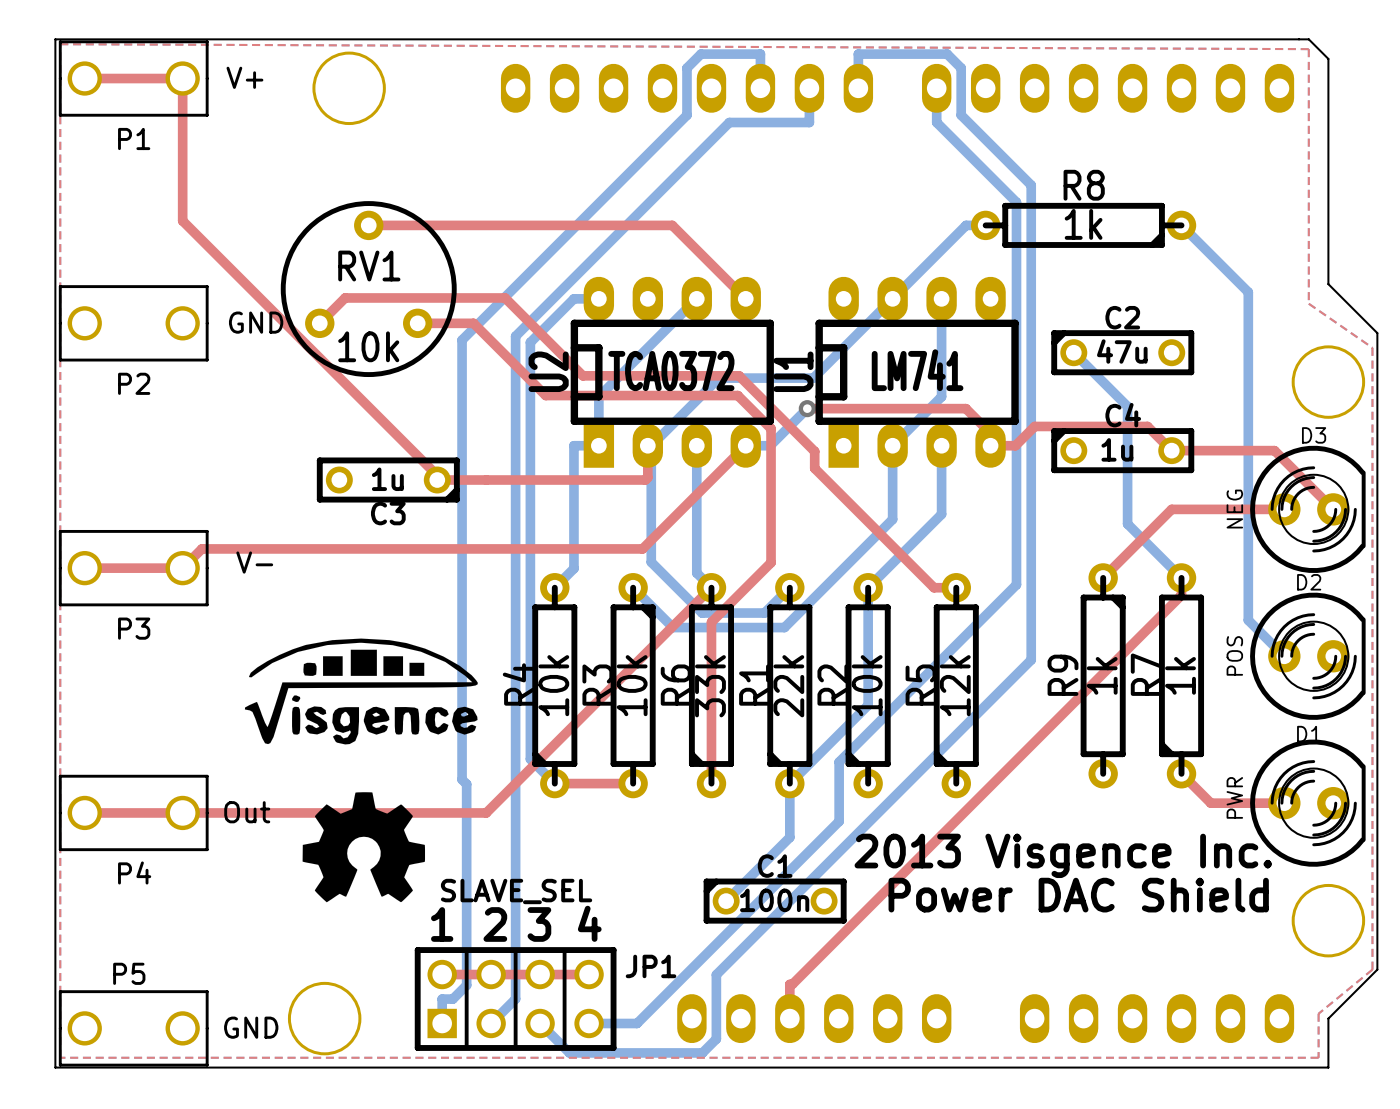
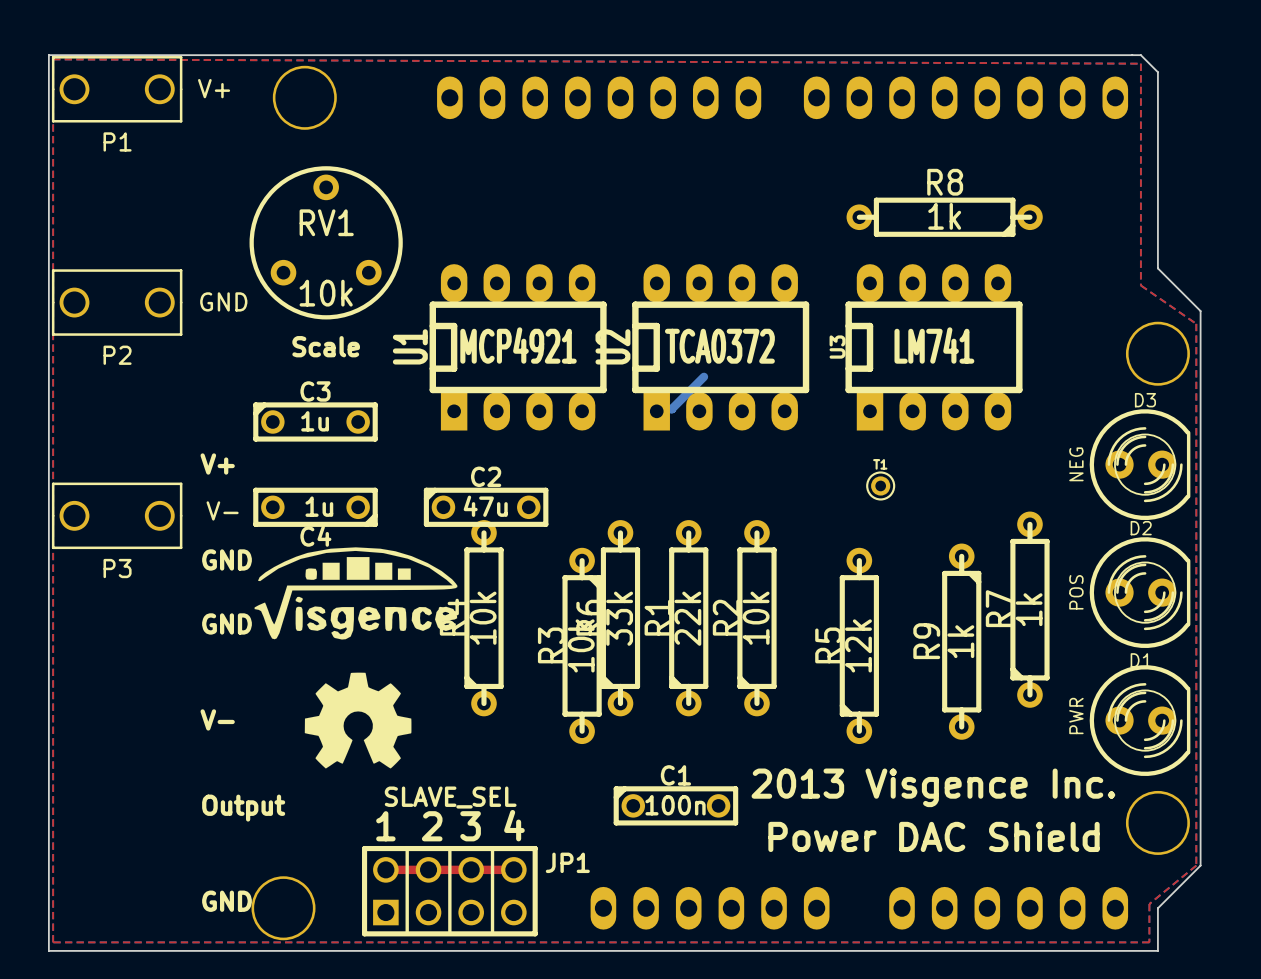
top track: (84, 78) (182, 78) (182, 220) (441, 480) (645, 480) (647, 477) (647, 445) -> none
bottom track: (760, 88) (760, 54) (700, 54) (686, 68) (686, 115) (462, 340) (462, 779) (466, 784) (466, 985) (452, 999) (442, 999) (442, 1023) -> none
bottom track: (809, 88) (809, 122) (729, 122) (515, 336) (515, 999) (491, 1023) -> none
bottom track: (858, 88) (858, 54) (947, 54) (961, 68) (961, 115) (1031, 185) (1031, 659) (716, 974) (716, 1039) (702, 1052) (569, 1052) (540, 1023) -> none
bottom track: (936, 88) (936, 122) (1016, 202) (1016, 584) (839, 762) (839, 821) (637, 1023) (589, 1023) -> none
top track: (368, 225) (672, 225) (745, 298) -> none
bottom track: (985, 225) (966, 225) (813, 378) (718, 378) (651, 445) -> none
bottom track: (1181, 225) (1248, 292) (1248, 620) (1284, 656) -> none
RV1 position: (368, 289) -> (326, 242)
bottom track: (598, 298) (573, 298) (530, 342) (530, 759) (554, 783) -> none
bottom track: (696, 298) (598, 396) (598, 445) (573, 445) (573, 568) (554, 587) -> none
bottom track: (941, 298) (941, 396) (892, 445) (892, 519) (784, 627) (672, 627) (633, 587) -> none
top track: (319, 323) (345, 297) (505, 297) (582, 375) (739, 375) (814, 451) (814, 468) (934, 587) (956, 587) -> none
top track: (417, 323) (473, 323) (545, 395) (737, 395) (771, 428) (771, 562) (711, 622) (711, 783) -> none
bottom track: (1073, 352) (1127, 406) (1127, 524) (1181, 577) -> none
C2 position: (1122, 352) -> (486, 507)
U1 value: LM741 (917, 370) -> MCP4921 (518, 345)
U2 position: (672, 372) -> (720, 347)
U1 position: (917, 372) -> (518, 347)
text: none -> Scale (326, 346)
U3: none -> LM741 (934, 347)
top track: (807, 408) (965, 408) (1003, 445) -> none
via: (807, 408) -> none
bottom track: (651, 445) (651, 562) (702, 613) (764, 613) (789, 587) -> none
bottom track: (696, 445) (696, 573) (711, 587) -> none
top track: (745, 445) (642, 548) (201, 548) (182, 568) (84, 568) -> none
bottom track: (941, 445) (941, 514) (868, 587) (868, 705) (789, 783) (789, 837) (726, 901) -> none
top track: (990, 445) (1015, 445) (1034, 426) (1147, 426) (1171, 450) (1274, 450) (1333, 509) -> none
C4 rotation: 0° (1122, 450) -> 180° (315, 507)
C4 position: (1122, 450) -> (315, 507)
C3 rotation: 0° (388, 480) -> 180° (315, 421)
text: none -> V+ (217, 464)
top track: (1284, 509) (1171, 509) (1103, 577) -> none
T1: none -> (880, 485)
top track: (1181, 577) (1181, 595) (792, 984) (789, 984) (789, 1018) -> none
top track: (711, 587) (486, 812) (84, 812) -> none
text: none -> GND (227, 559)
R9 position: (1103, 675) -> (961, 641)
R3 position: (633, 685) -> (582, 645)
R5 position: (956, 685) -> (859, 645)
drawing position: (361, 691) -> (355, 593)
text: none -> GND (227, 623)
top track: (1181, 773) (1210, 803) (1284, 803) -> none
top track: (554, 783) (633, 783) -> none
text: none -> V- (217, 719)
P4: Out (133, 812) -> none
drawing position: (363, 847) -> (358, 720)
text position: 2013 Visgence Inc. (1063, 855) -> 2013 Visgence Inc. (933, 787)
text position: Power DAC Shield (1078, 895) -> Power DAC Shield (934, 836)
text: none -> Output (243, 808)
text: none -> GND (227, 901)
P5: GND (133, 1028) -> none

